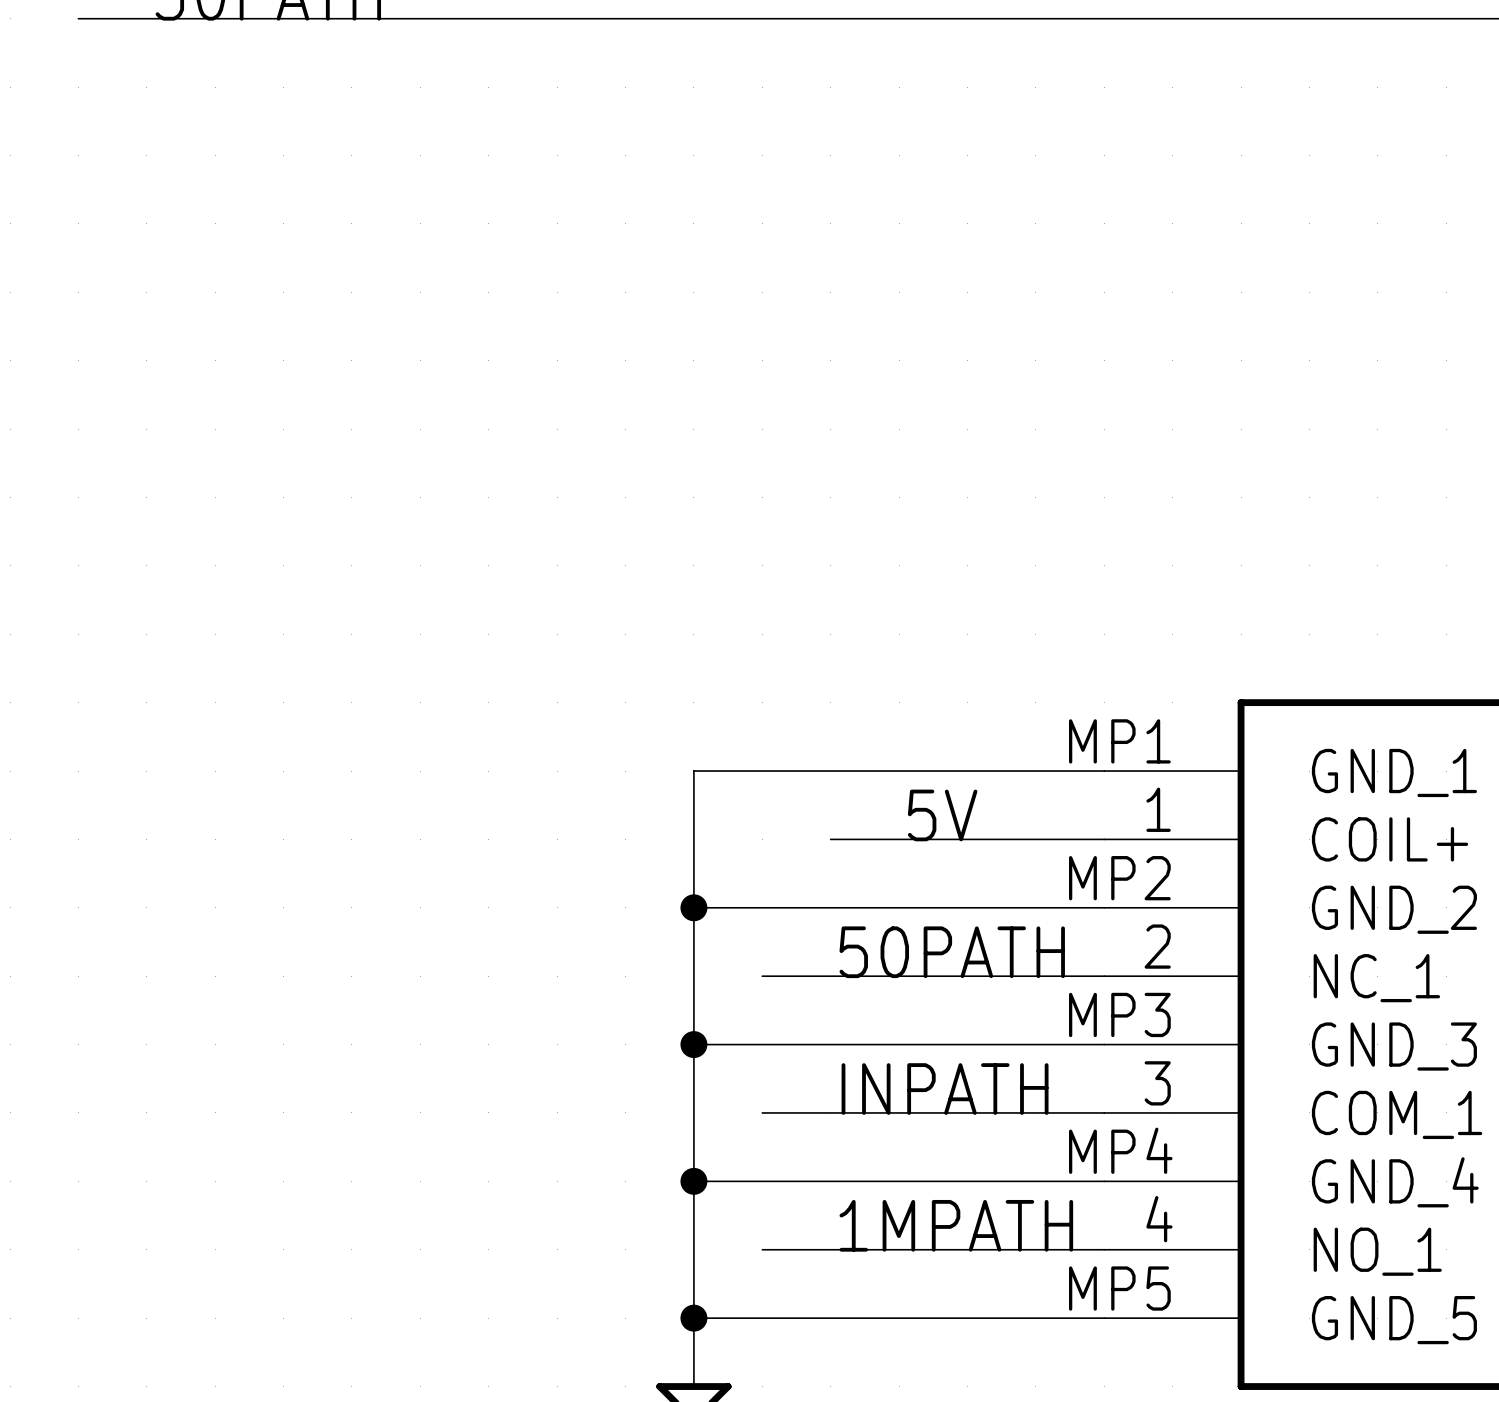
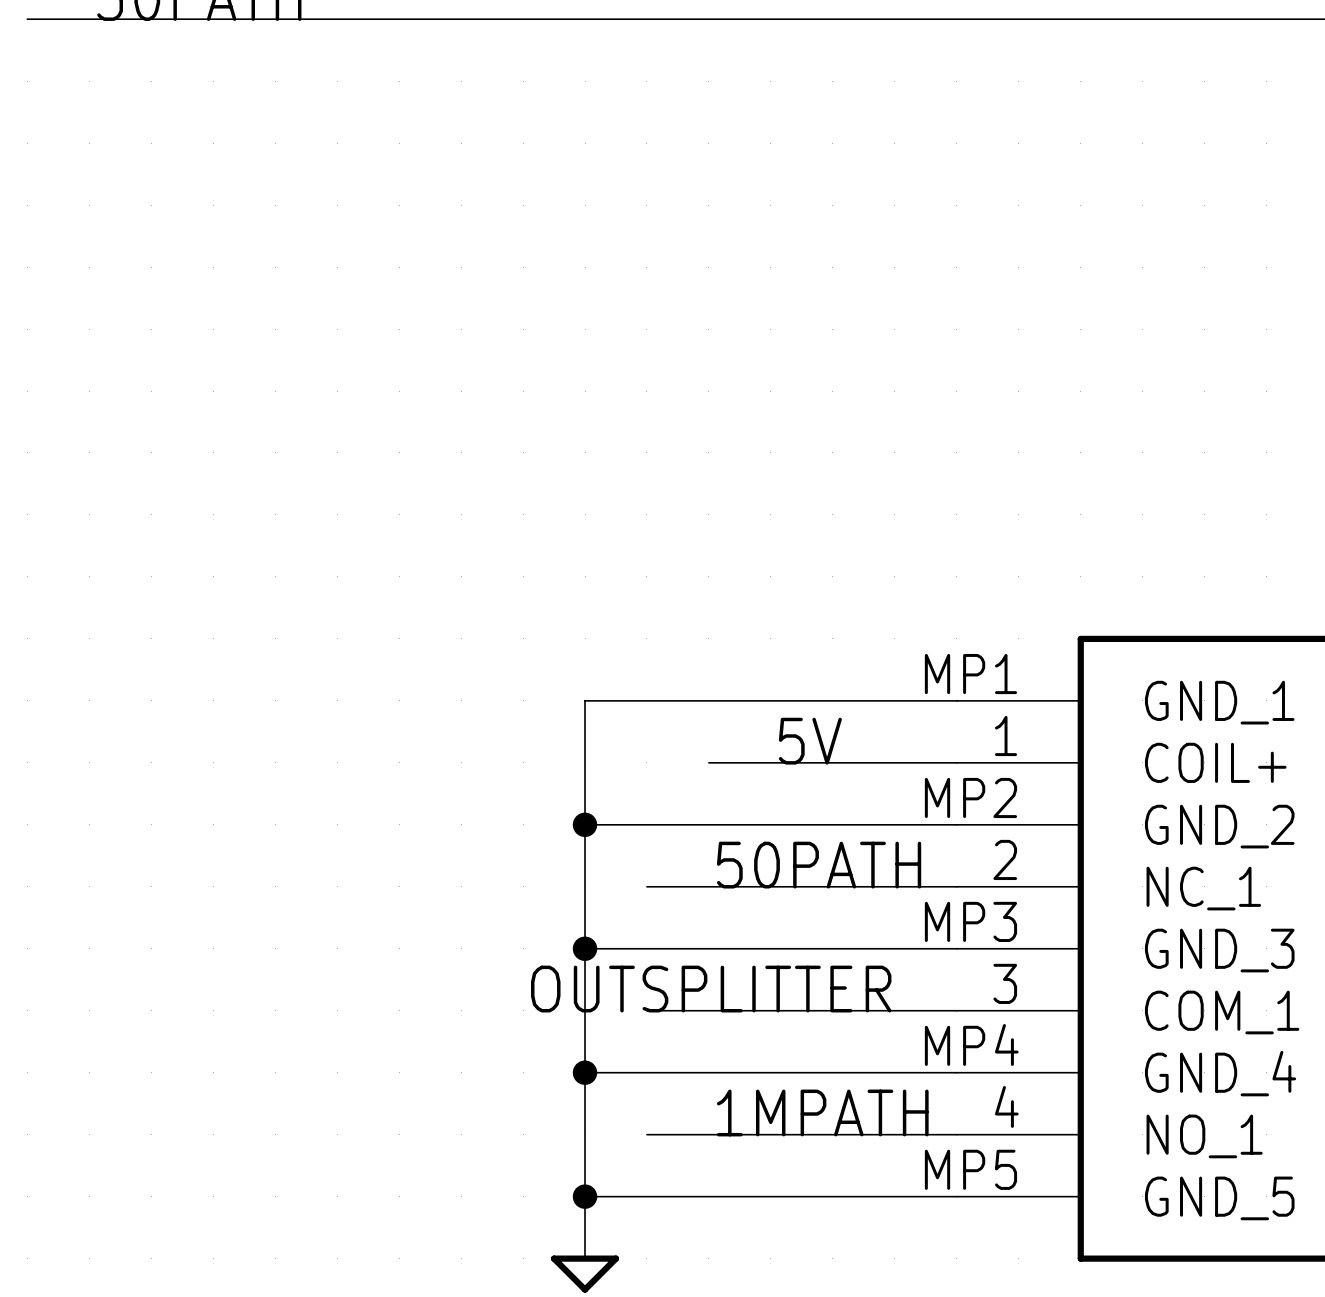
label: none -> OUTSPLITTER (711, 989)
label: INPATH (945, 1089) -> none

